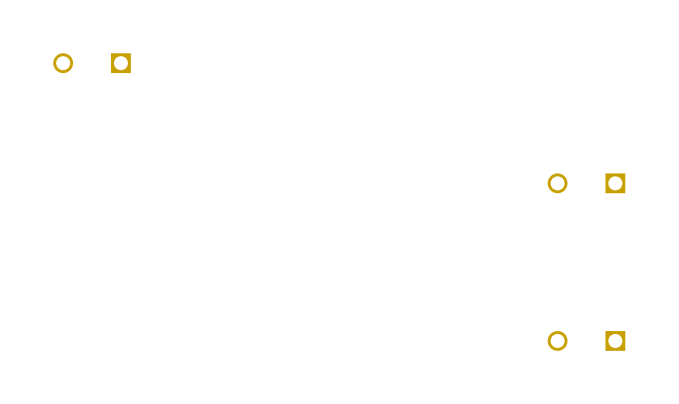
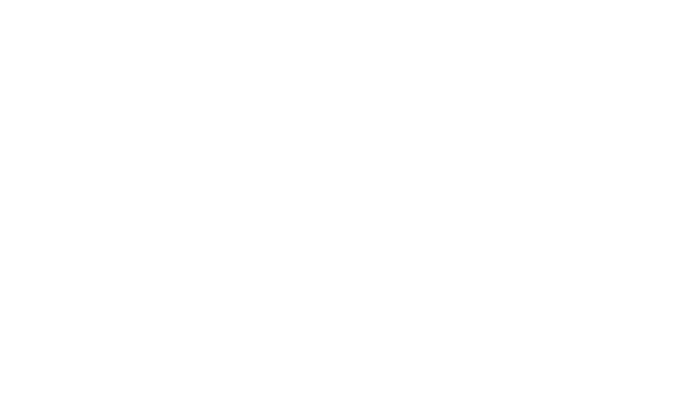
part: (92, 63) -> none
part: (586, 183) -> none
part: (586, 340) -> none

